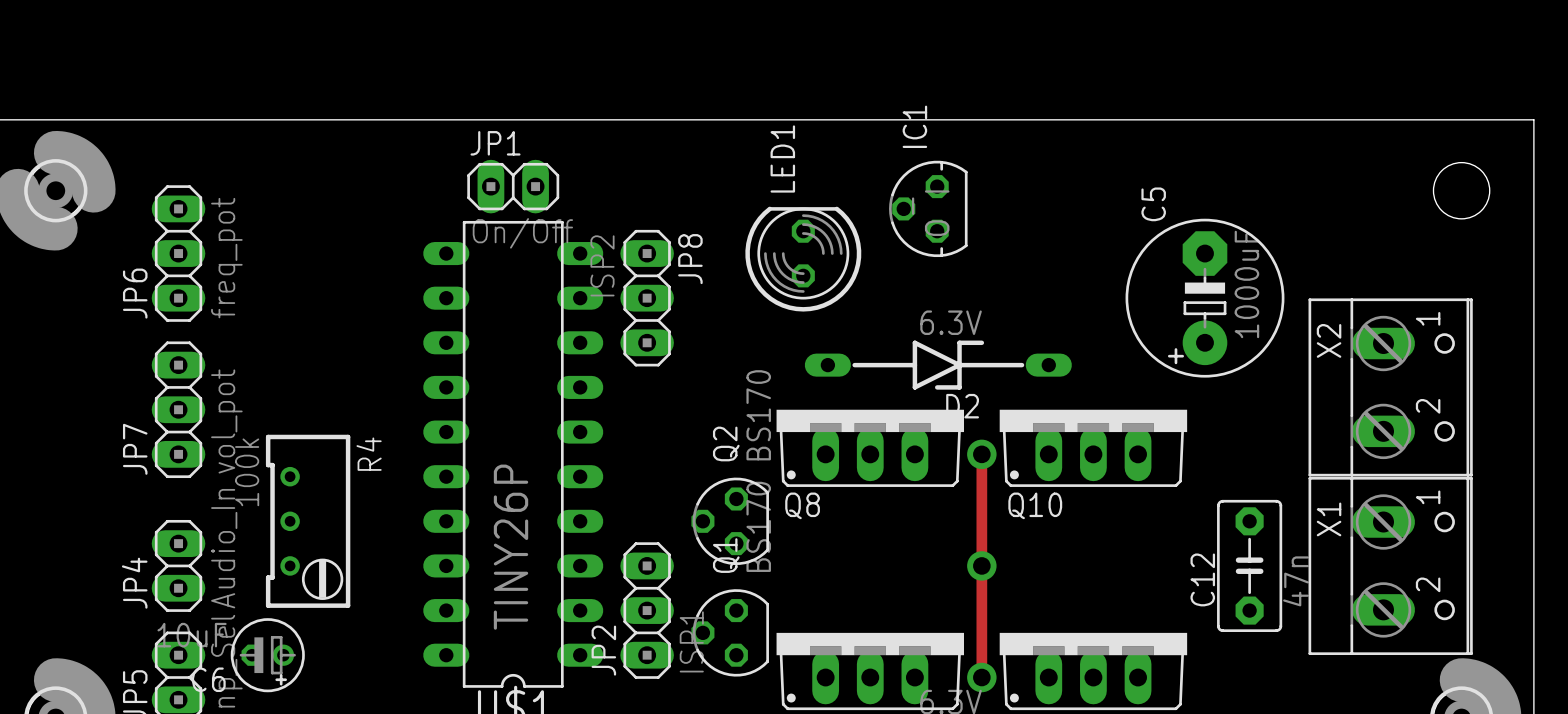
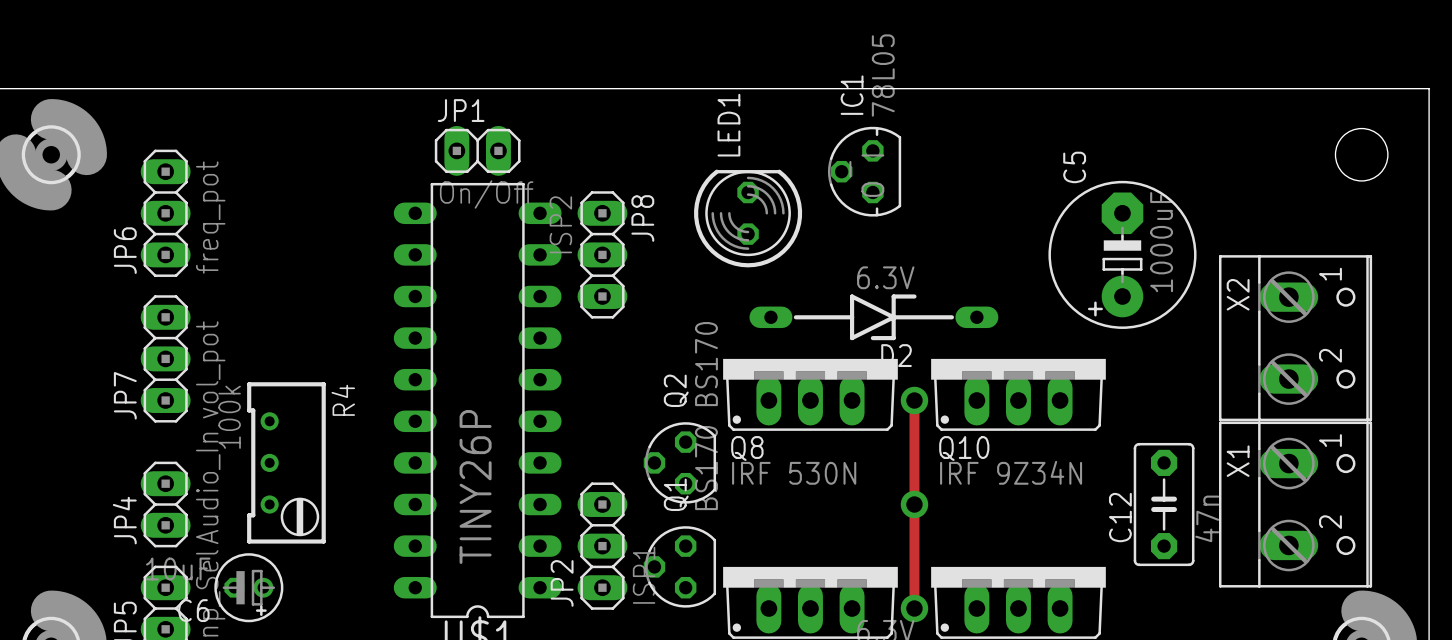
IC1 value: none -> 78L05 (883, 75)
Q10 value: none -> IRF 9Z34N (1011, 472)
Q8 value: none -> IRF 530N (794, 473)

